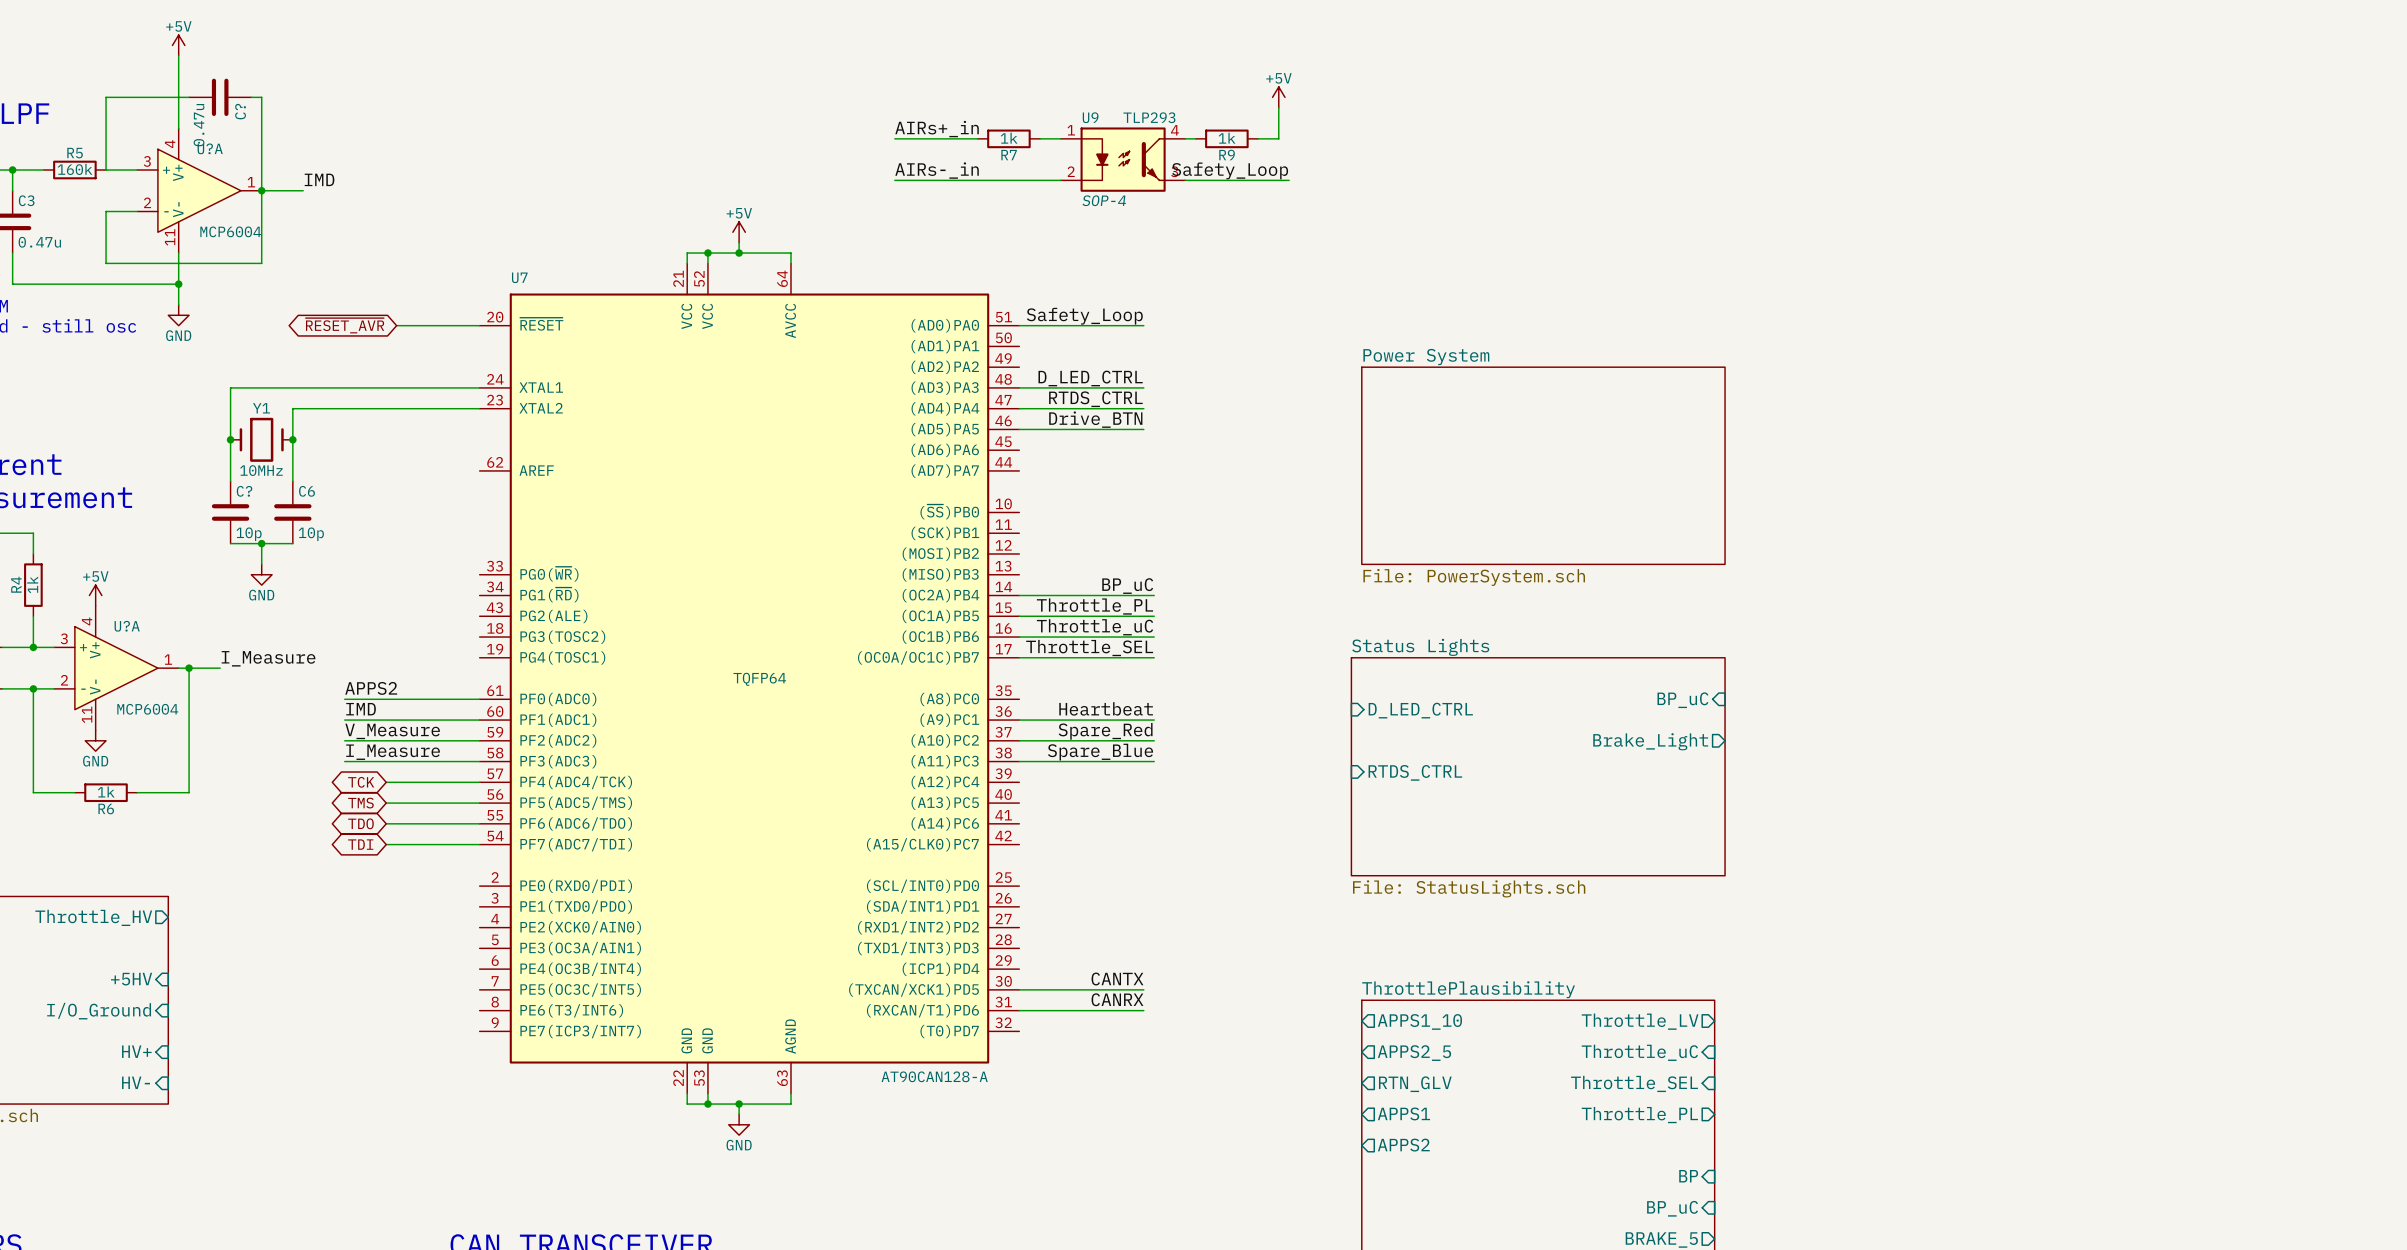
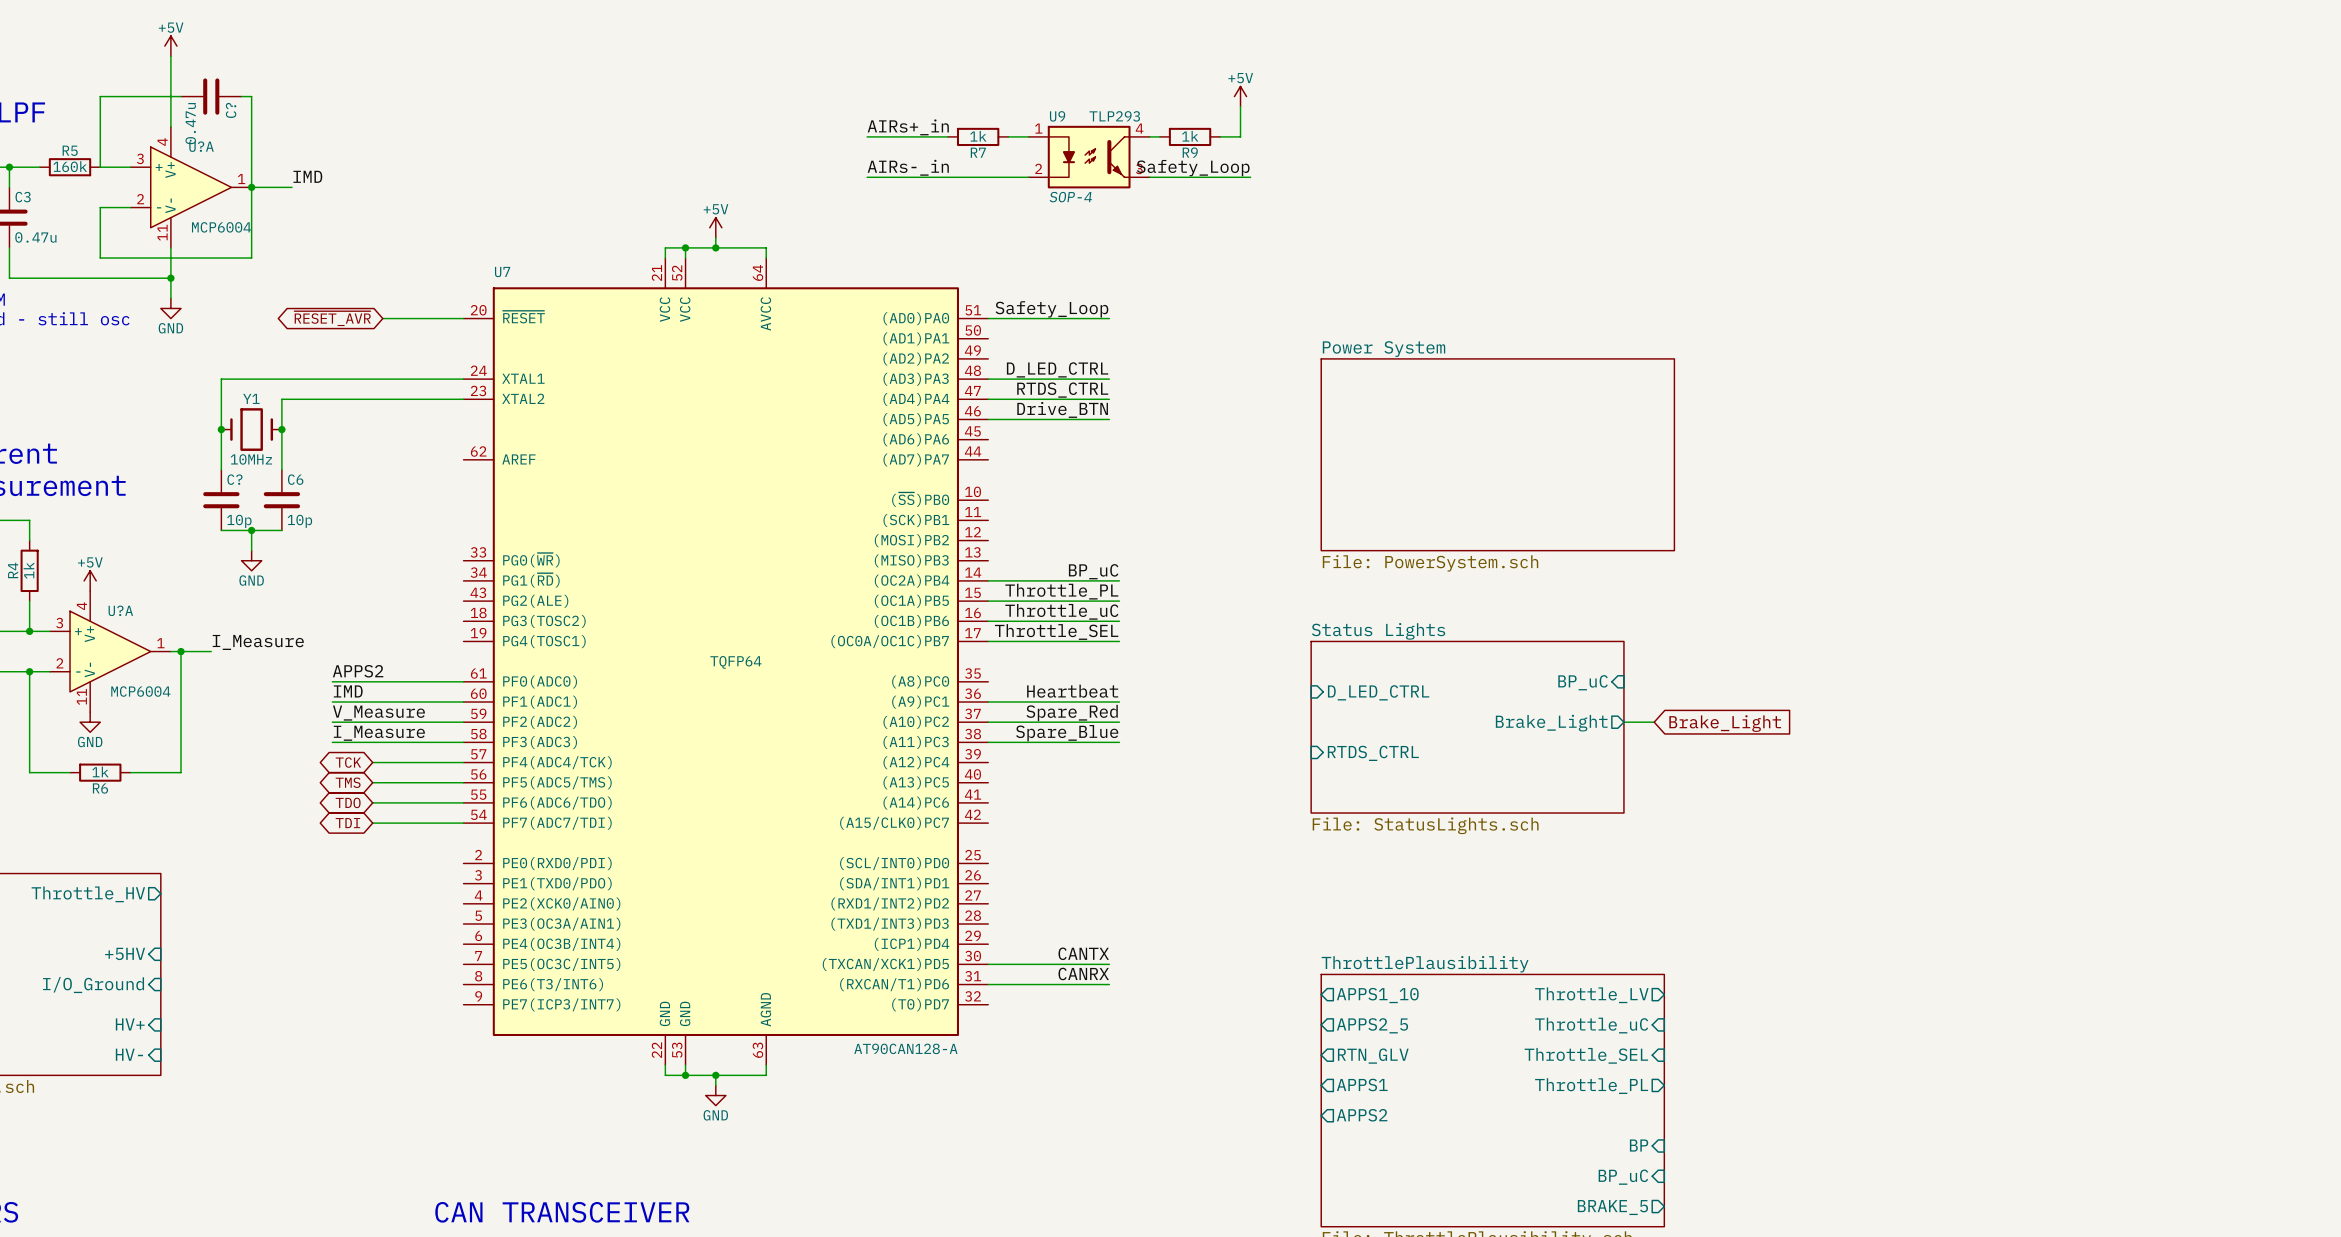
sheet pin position: BP_uC (1682, 700) -> BP_uC (1583, 682)
wire: none -> (1623, 722) (1654, 722)
sheet pin position: Brake_Light (1650, 741) -> Brake_Light (1551, 723)
global label: none -> Brake_Light (1725, 723)
sheet Status Lights: none -> File: StatusLights.sch (1467, 727)
sheet Status Lights: File: StatusLights.sch (1538, 766) -> none

